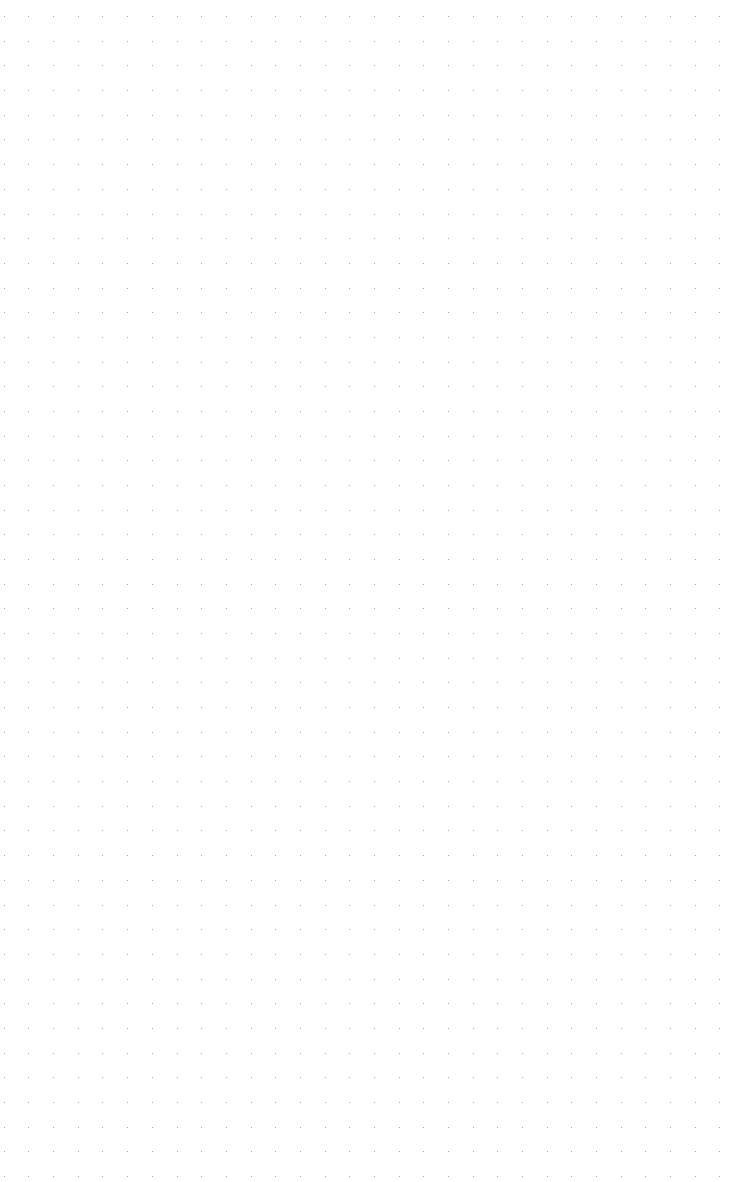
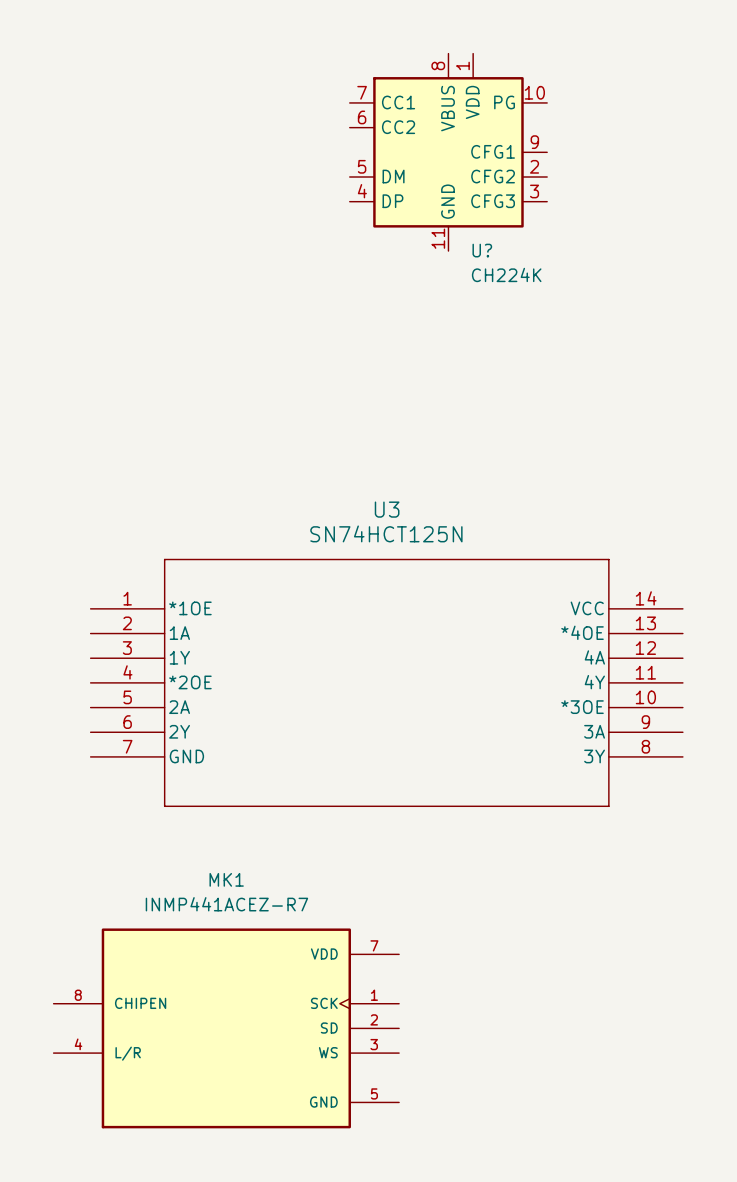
U?: none -> CH224K (448, 152)
U3: none -> SN74HCT125N (386, 682)
MK1: none -> INMP441ACEZ-R7 (226, 1028)

